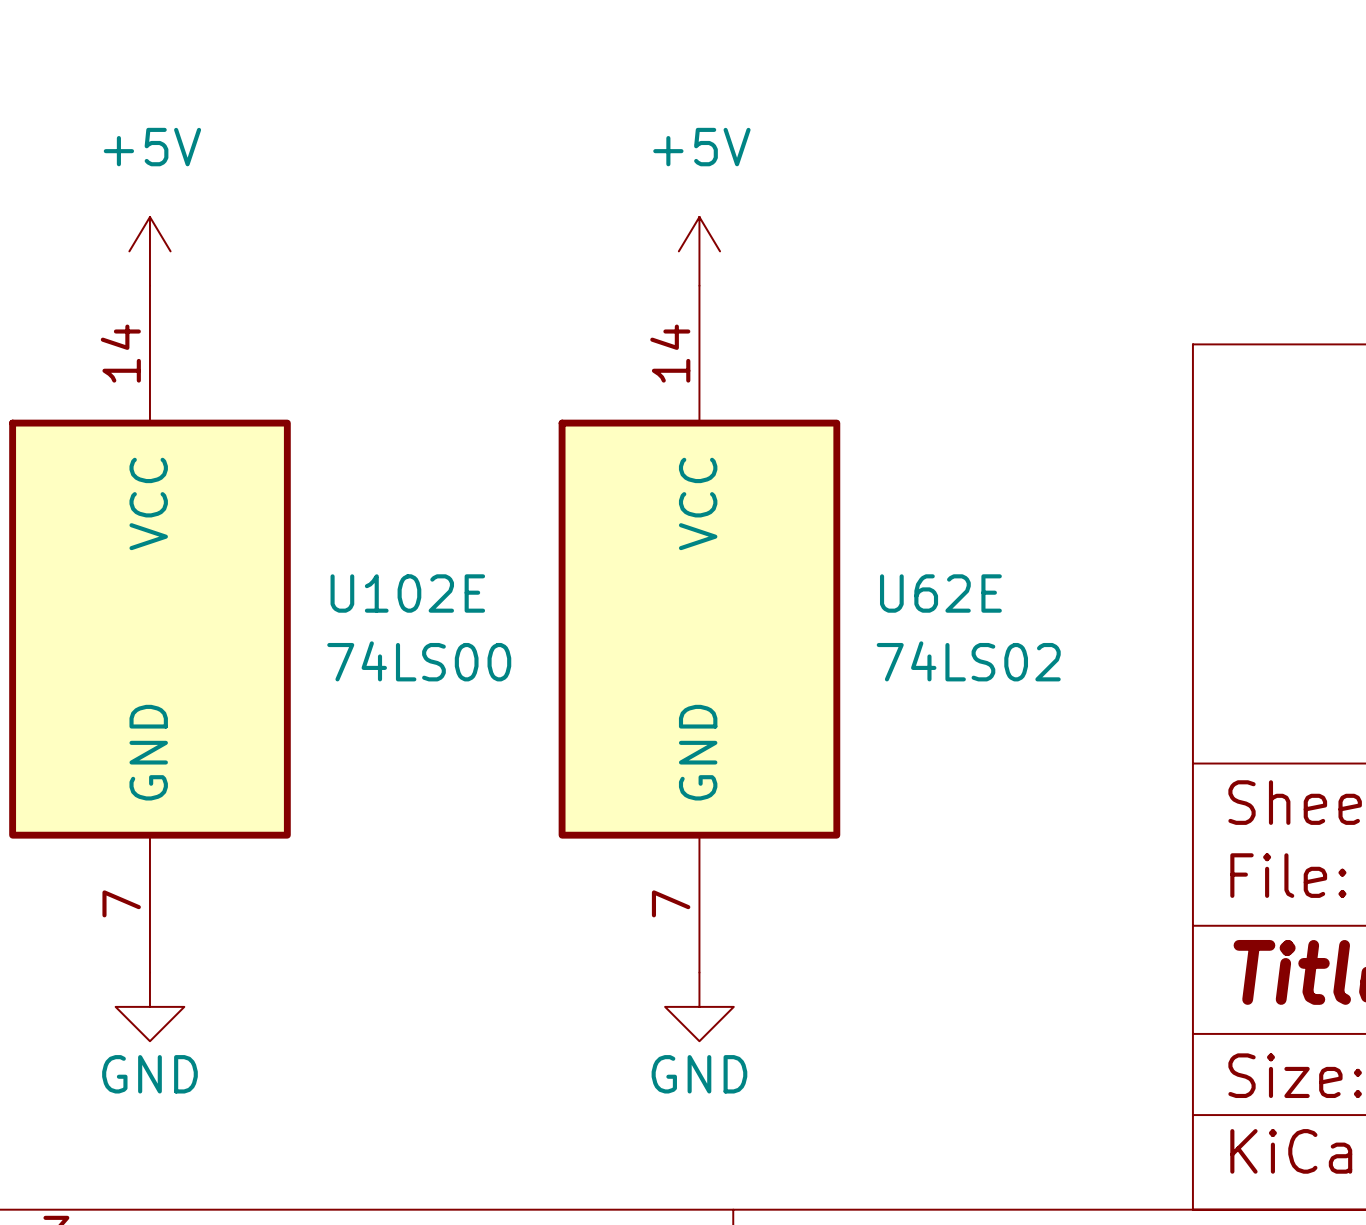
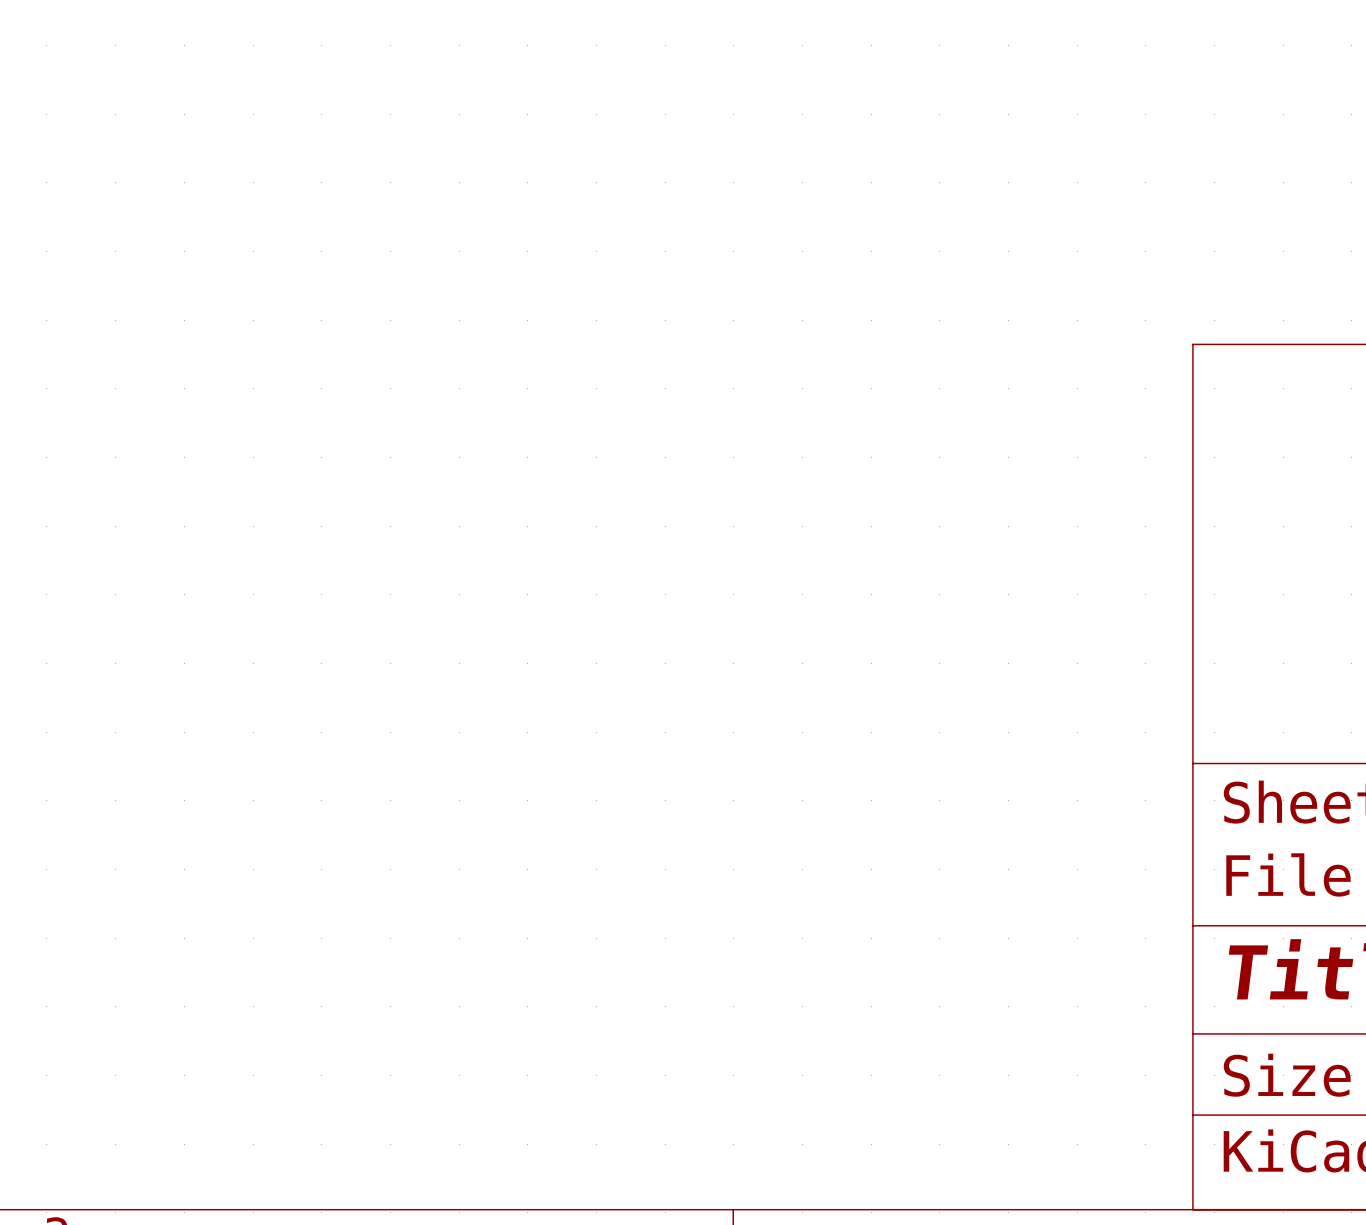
power symbol: +5V (149, 251) -> none
power symbol: +5V (699, 251) -> none
U102E: 74LS00 (149, 629) -> none
U62E: 74LS02 (699, 629) -> none
power symbol: GND (149, 1006) -> none
power symbol: GND (699, 1006) -> none

